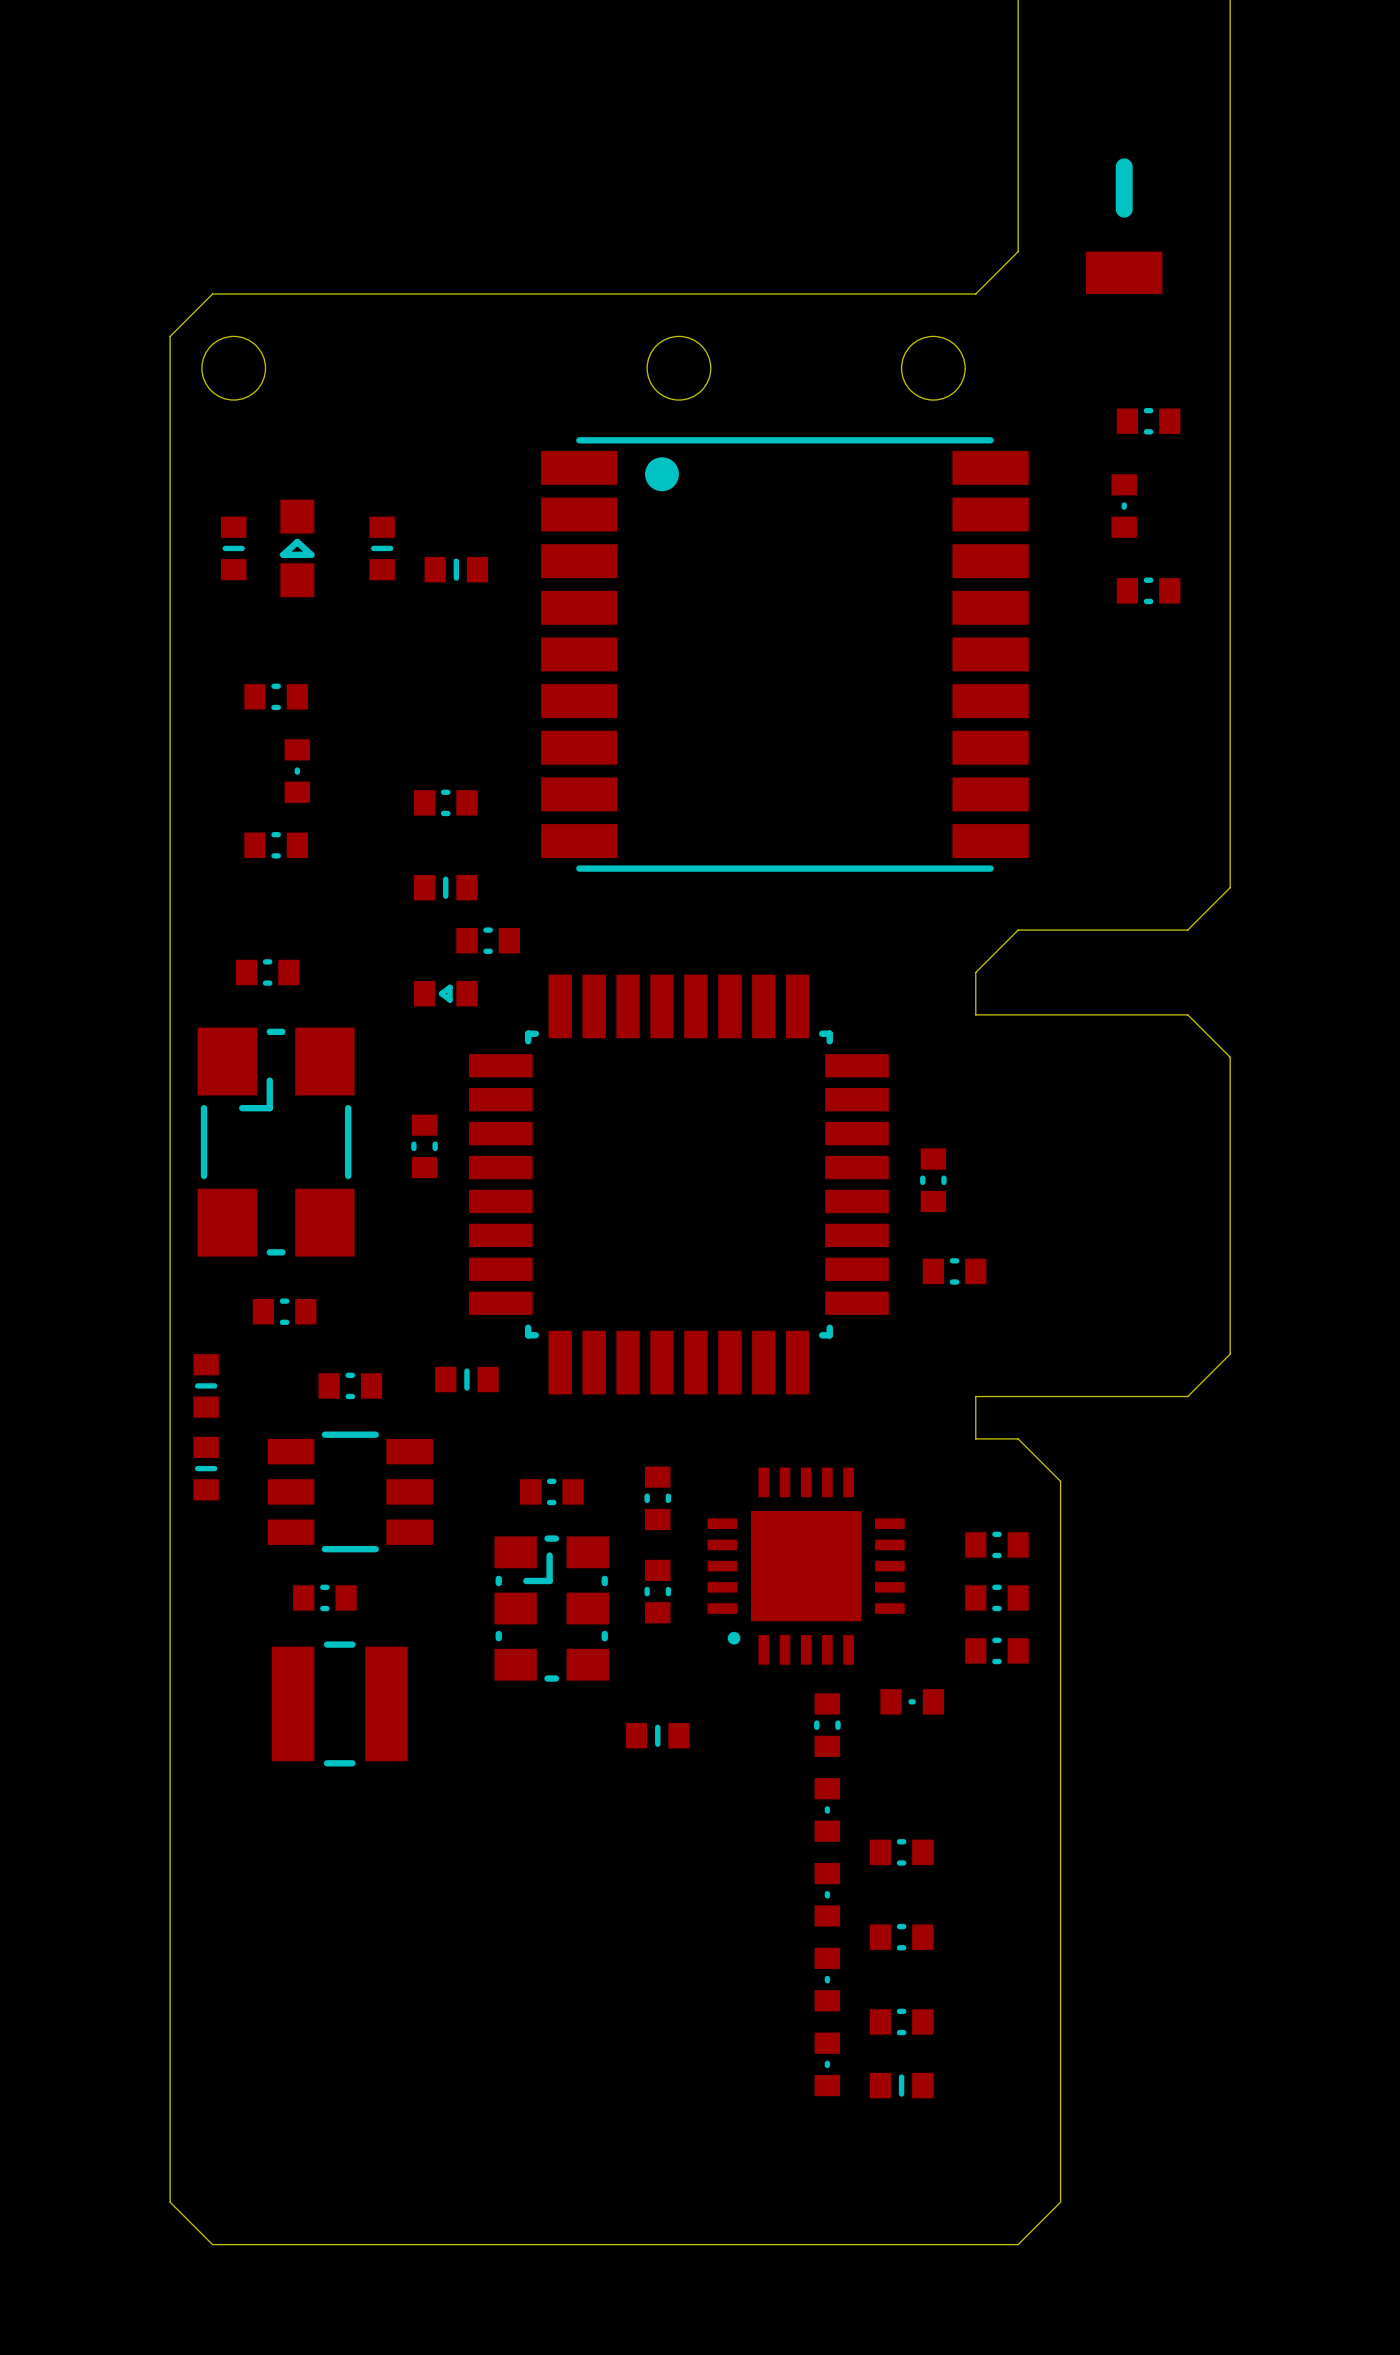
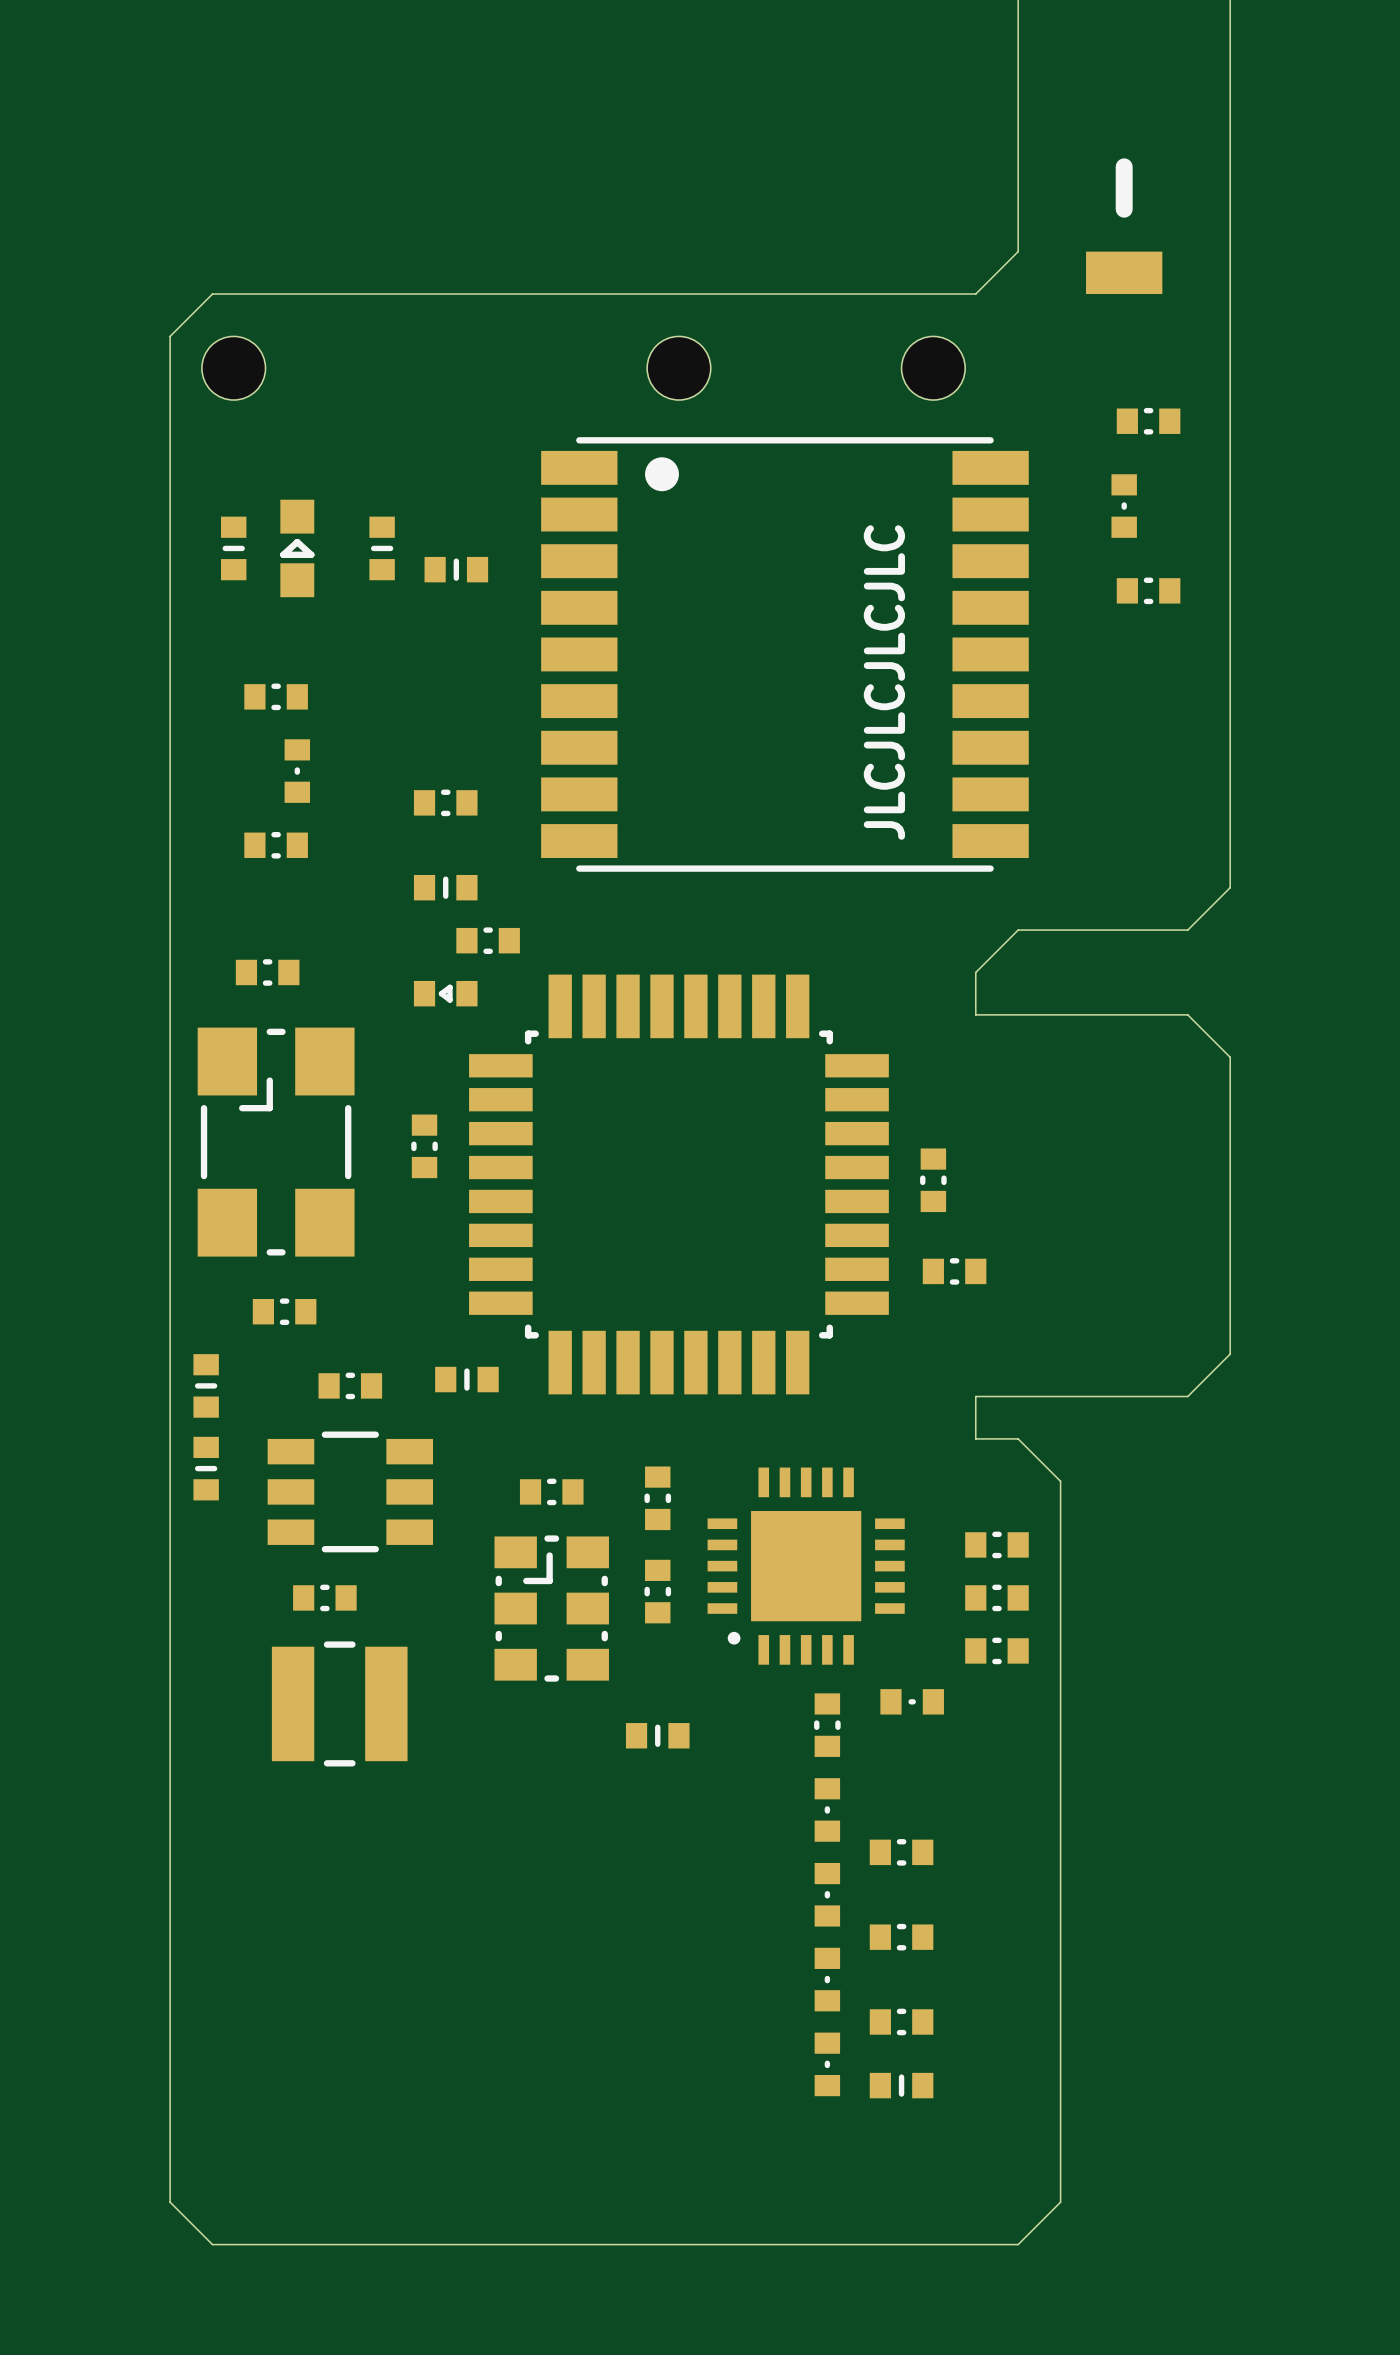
text: none -> JLCJLCJLCJLC (884, 682)

